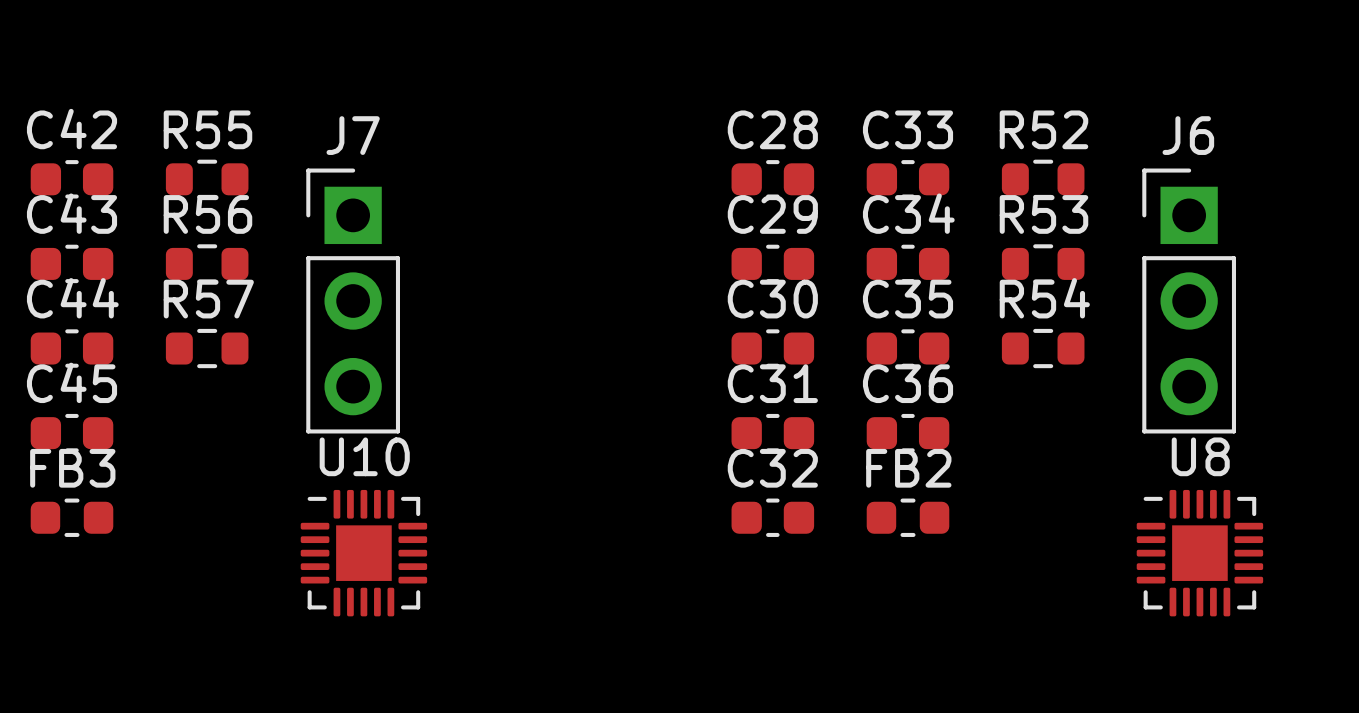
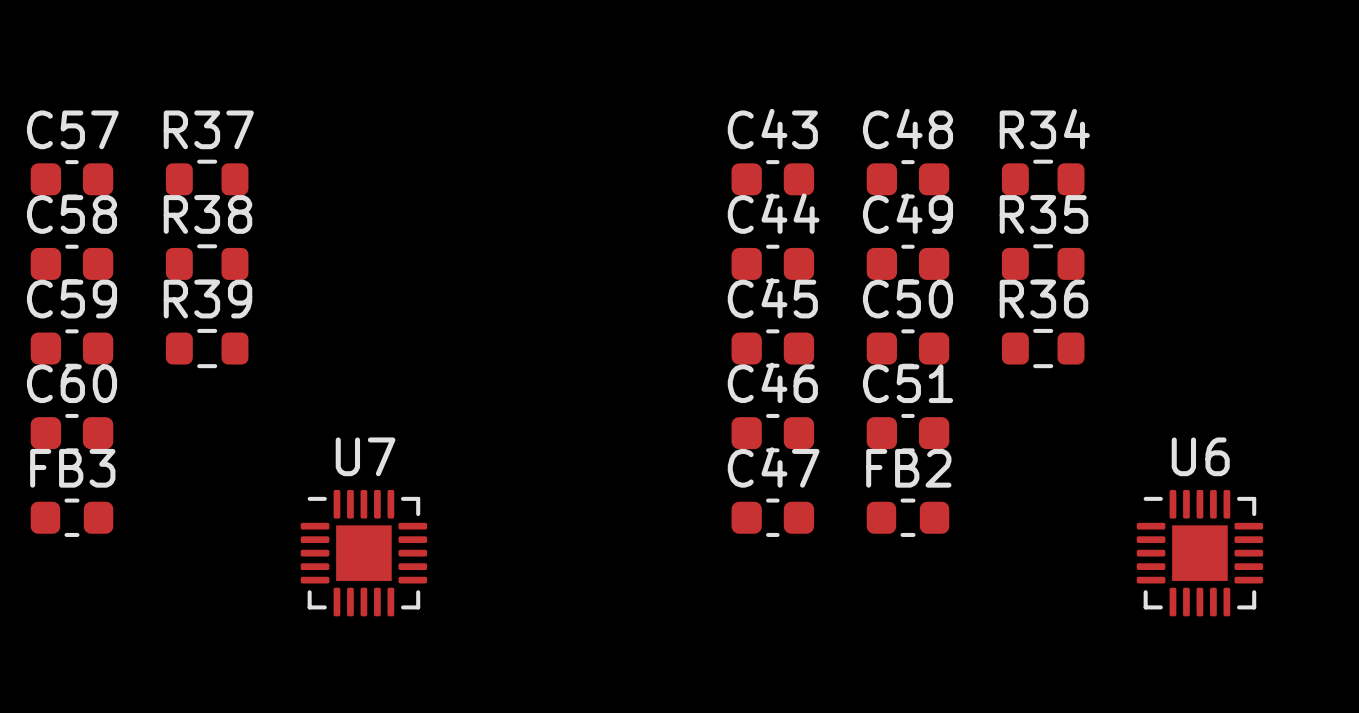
C42 name: C42 (71, 129) -> C57 (72, 129)
R55 name: R55 (207, 129) -> R37 (208, 129)
C28 name: C28 (772, 129) -> C43 (772, 129)
C33 name: C33 (908, 129) -> C48 (908, 129)
R52 name: R52 (1043, 129) -> R34 (1044, 129)
C43 name: C43 (71, 213) -> C58 (71, 214)
C34 name: C34 (908, 213) -> C49 (908, 213)
R56 name: R56 (207, 214) -> R38 (207, 214)
C29 name: C29 (772, 214) -> C44 (773, 213)
R53 name: R53 (1043, 214) -> R35 (1043, 214)
C44 name: C44 (72, 298) -> C59 (71, 299)
R54 name: R54 (1044, 298) -> R36 (1043, 299)
R57 name: R57 (208, 299) -> R39 (207, 299)
C30 name: C30 (772, 299) -> C45 (772, 298)
C35 name: C35 (908, 299) -> C50 (908, 299)
J7: (353, 301) -> none
J6: (1189, 301) -> none
C45 name: C45 (71, 382) -> C60 (71, 383)
C31 name: C31 (772, 383) -> C46 (772, 382)
C36 name: C36 (908, 383) -> C51 (908, 383)
U10 name: U10 (364, 456) -> U7 (365, 456)
U8 name: U8 (1200, 456) -> U6 (1200, 456)
C32 name: C32 (772, 468) -> C47 (773, 467)

